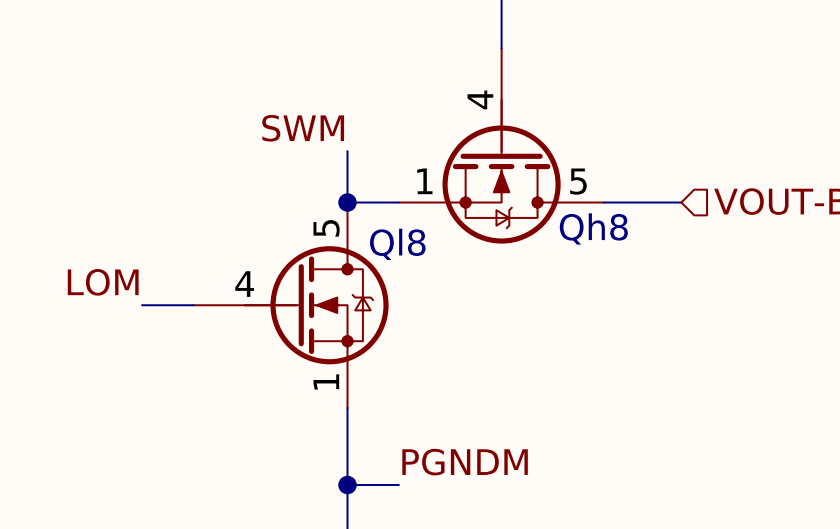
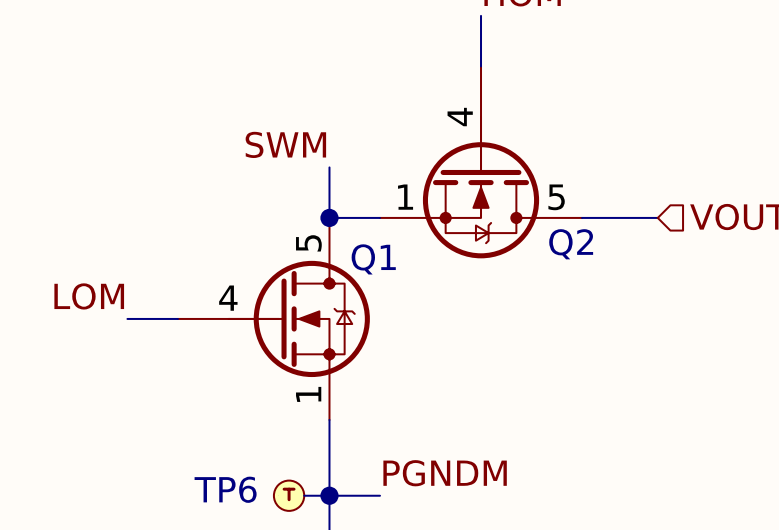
Qh8 name: Qh8 (593, 228) -> Q2 (571, 244)
Ql8 name: Ql8 (397, 244) -> Q1 (373, 259)
TP6: none -> (289, 495)
wire: none -> (304, 495) (329, 495)

